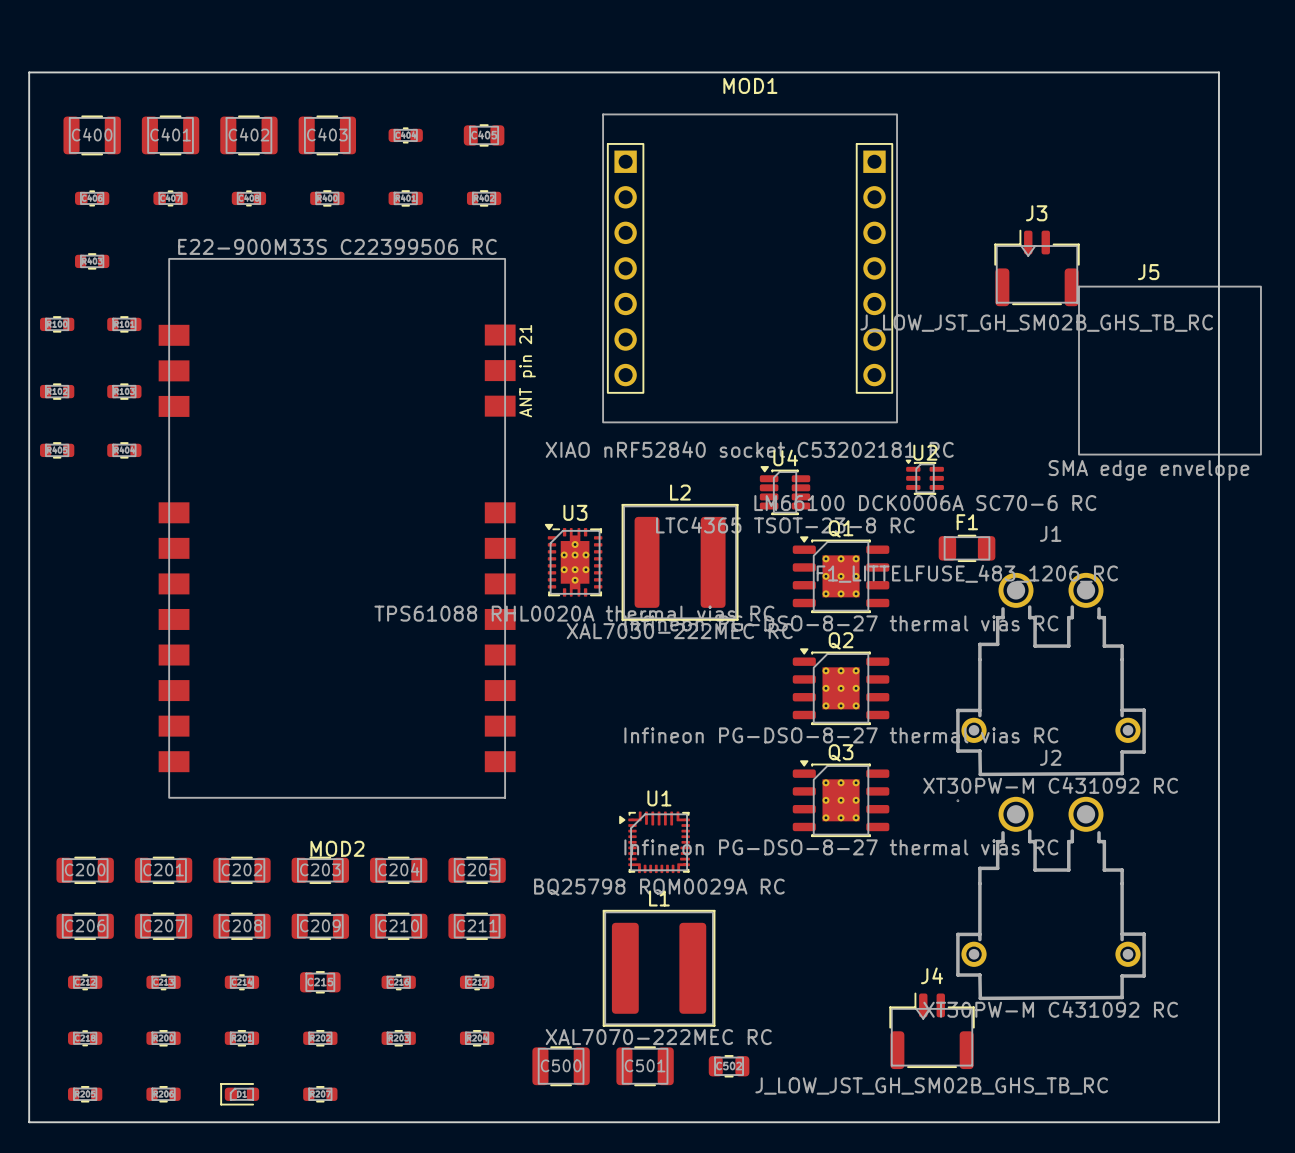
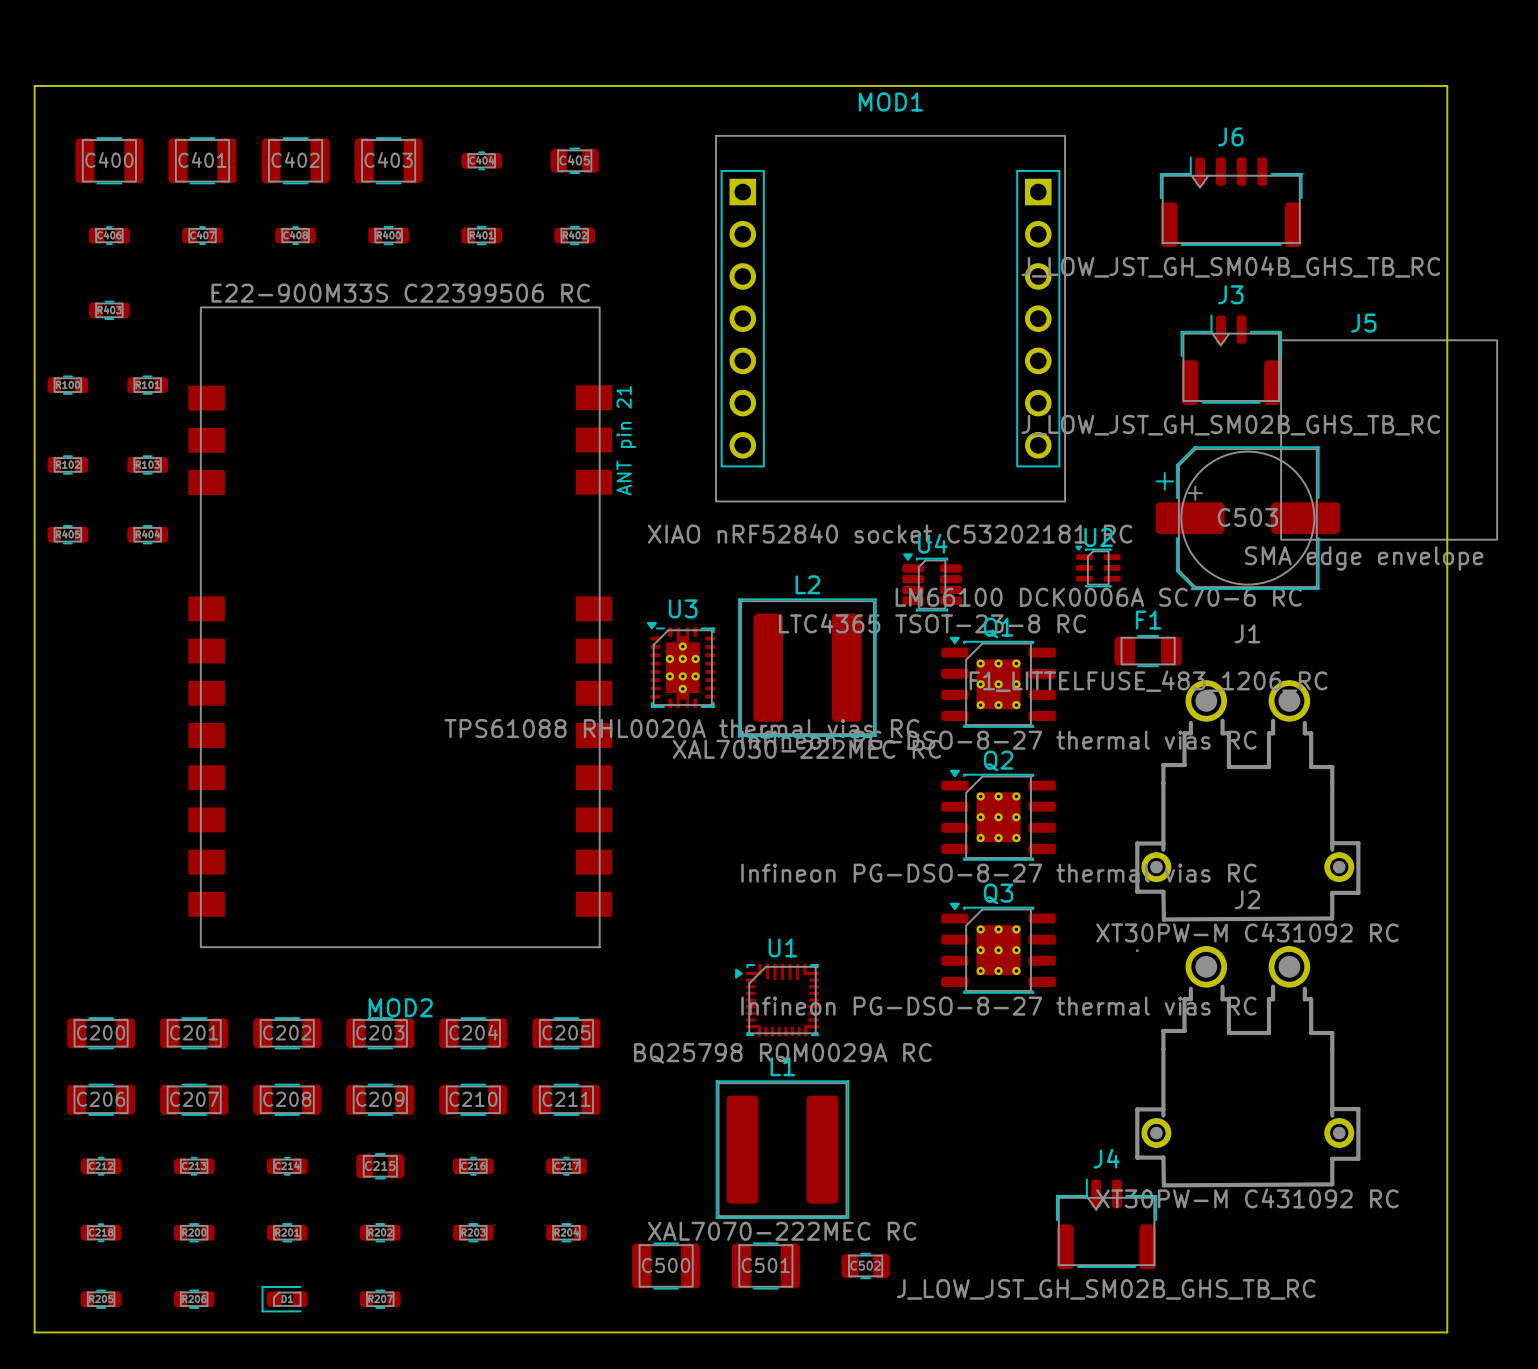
J6: none -> J_LOW_JST_GH_SM04B_GHS_TB_RC (1231, 201)
J3 position: (1037, 267) -> (1231, 359)
C503: none -> (1247, 518)

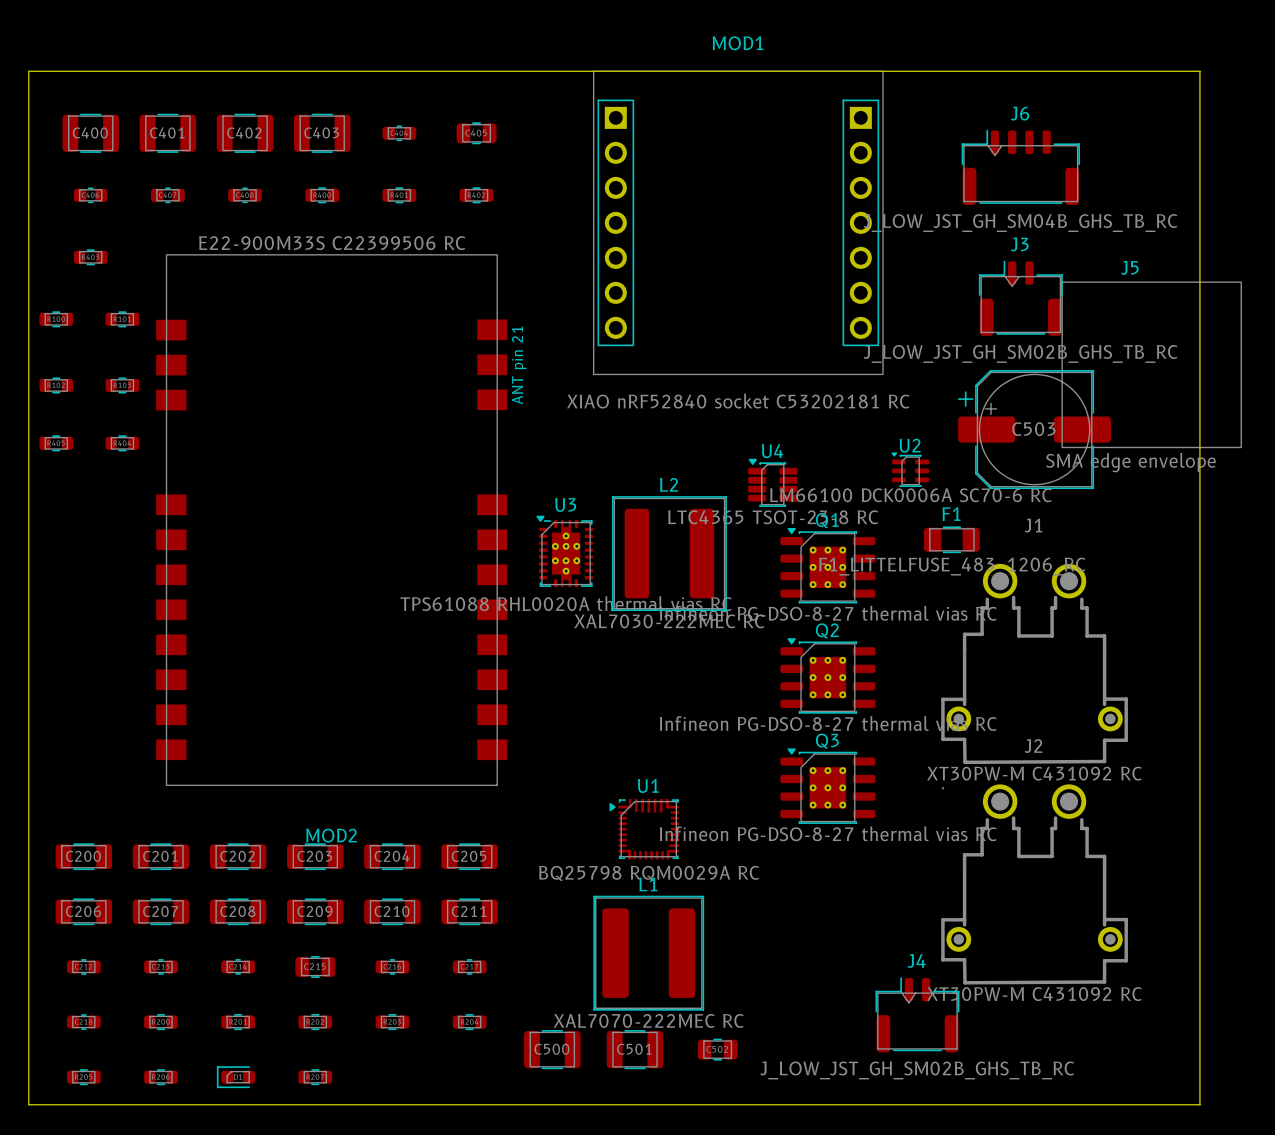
MOD1 position: (890, 318) -> (738, 222)

